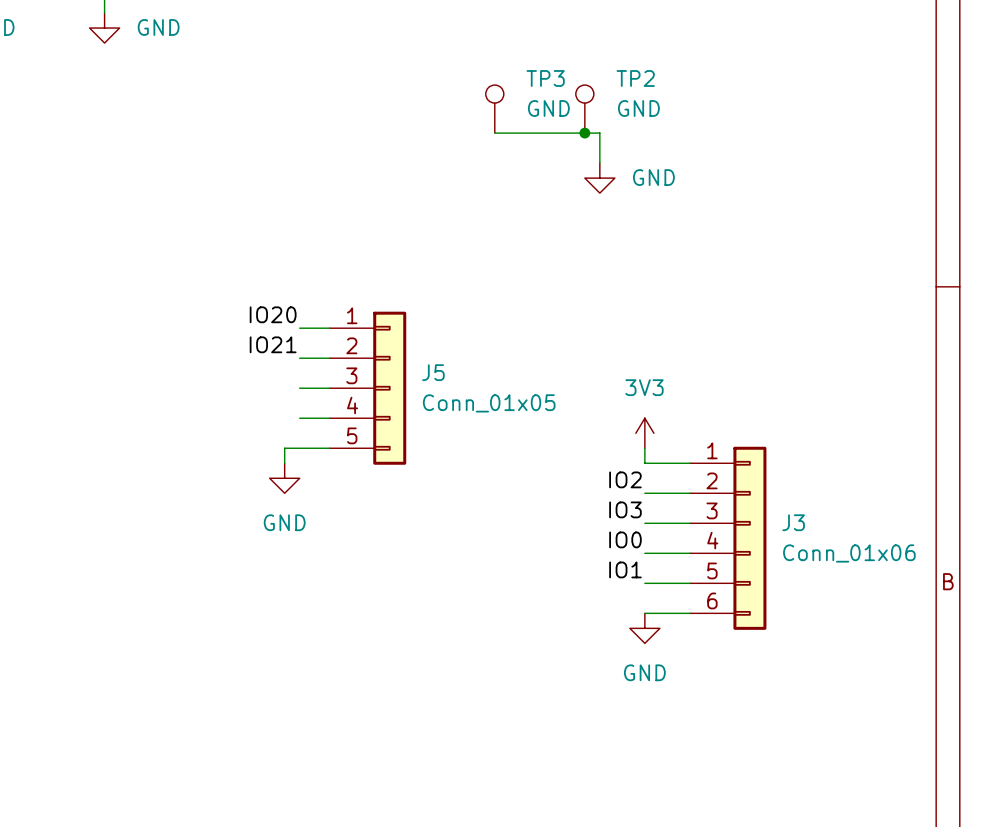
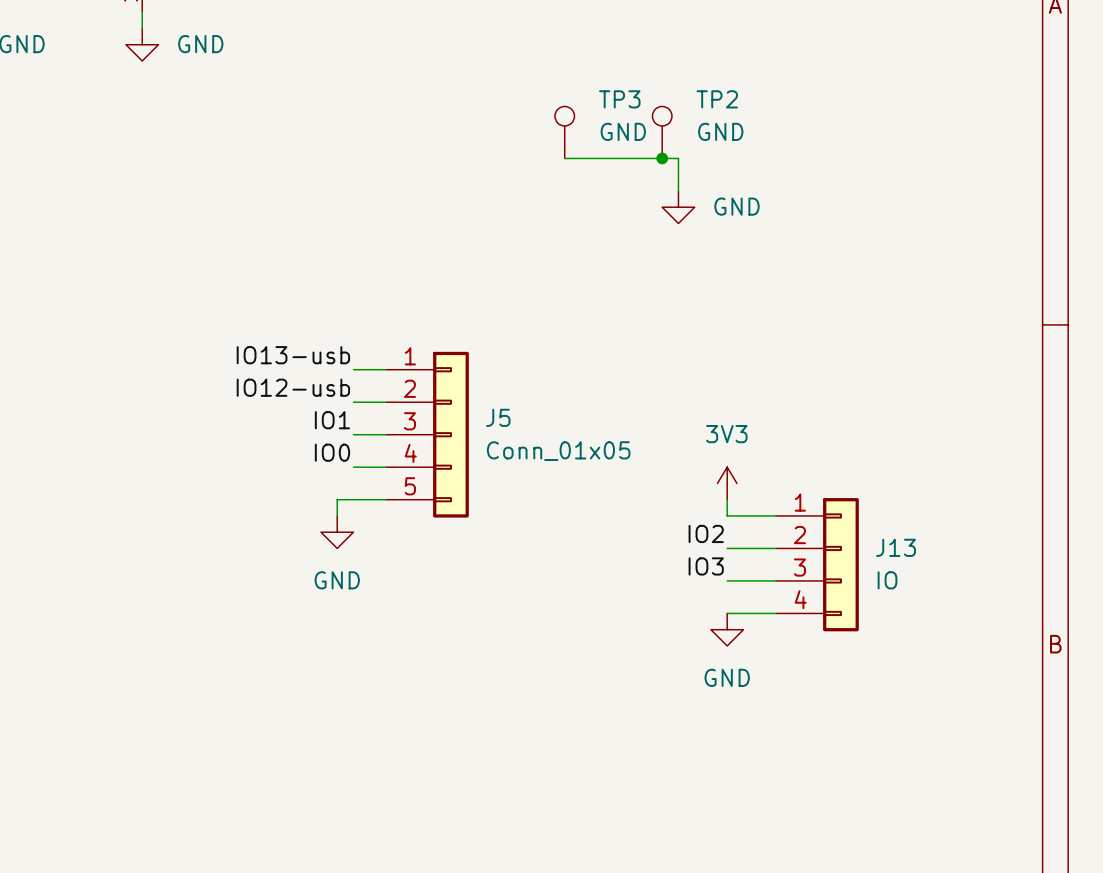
label: IO20 (273, 314) -> IO13-usb (293, 355)
label: IO21 (273, 344) -> IO12-usb (293, 387)
label: none -> IO1 (332, 420)
label: none -> IO0 (332, 452)
J13: none -> IO (817, 564)
J3: Conn_01x06 (728, 538) -> none
label: IO0 (625, 539) -> none
label: IO1 (625, 569) -> none
wire: (644, 583) (689, 583) -> none
wire: (644, 613) (689, 613) -> none
power symbol position: GND (644, 628) -> GND (727, 629)

